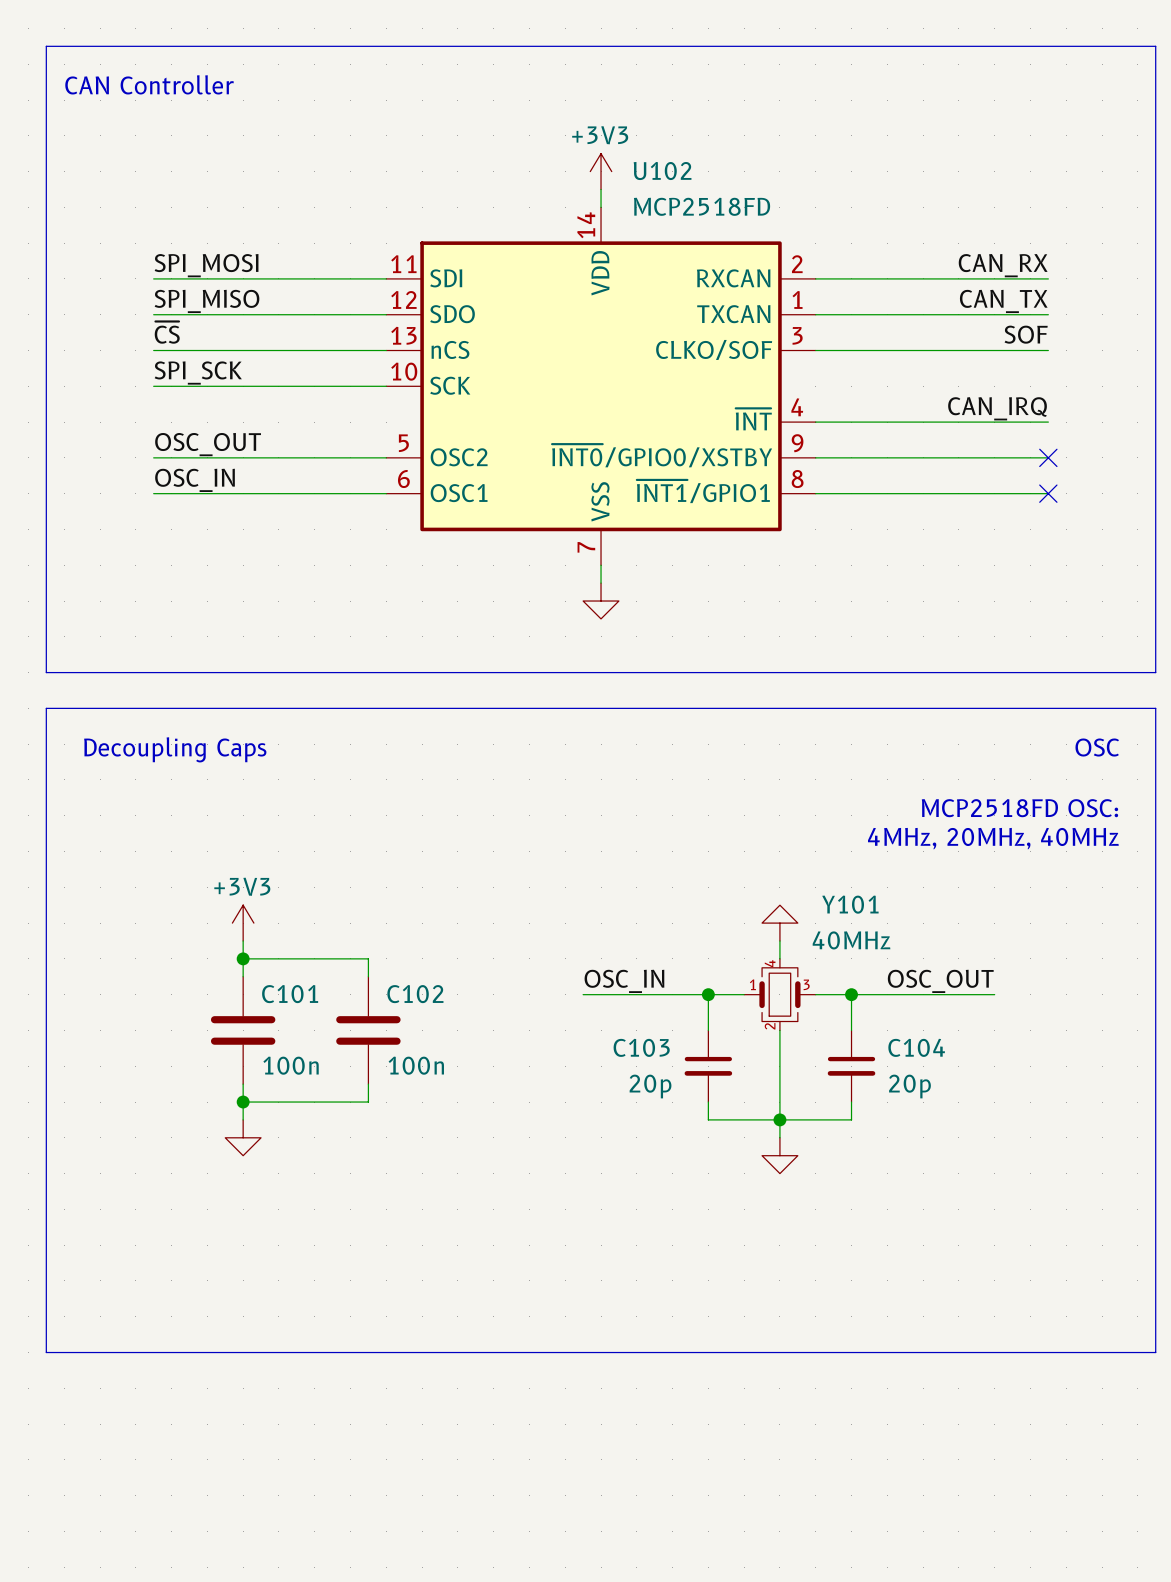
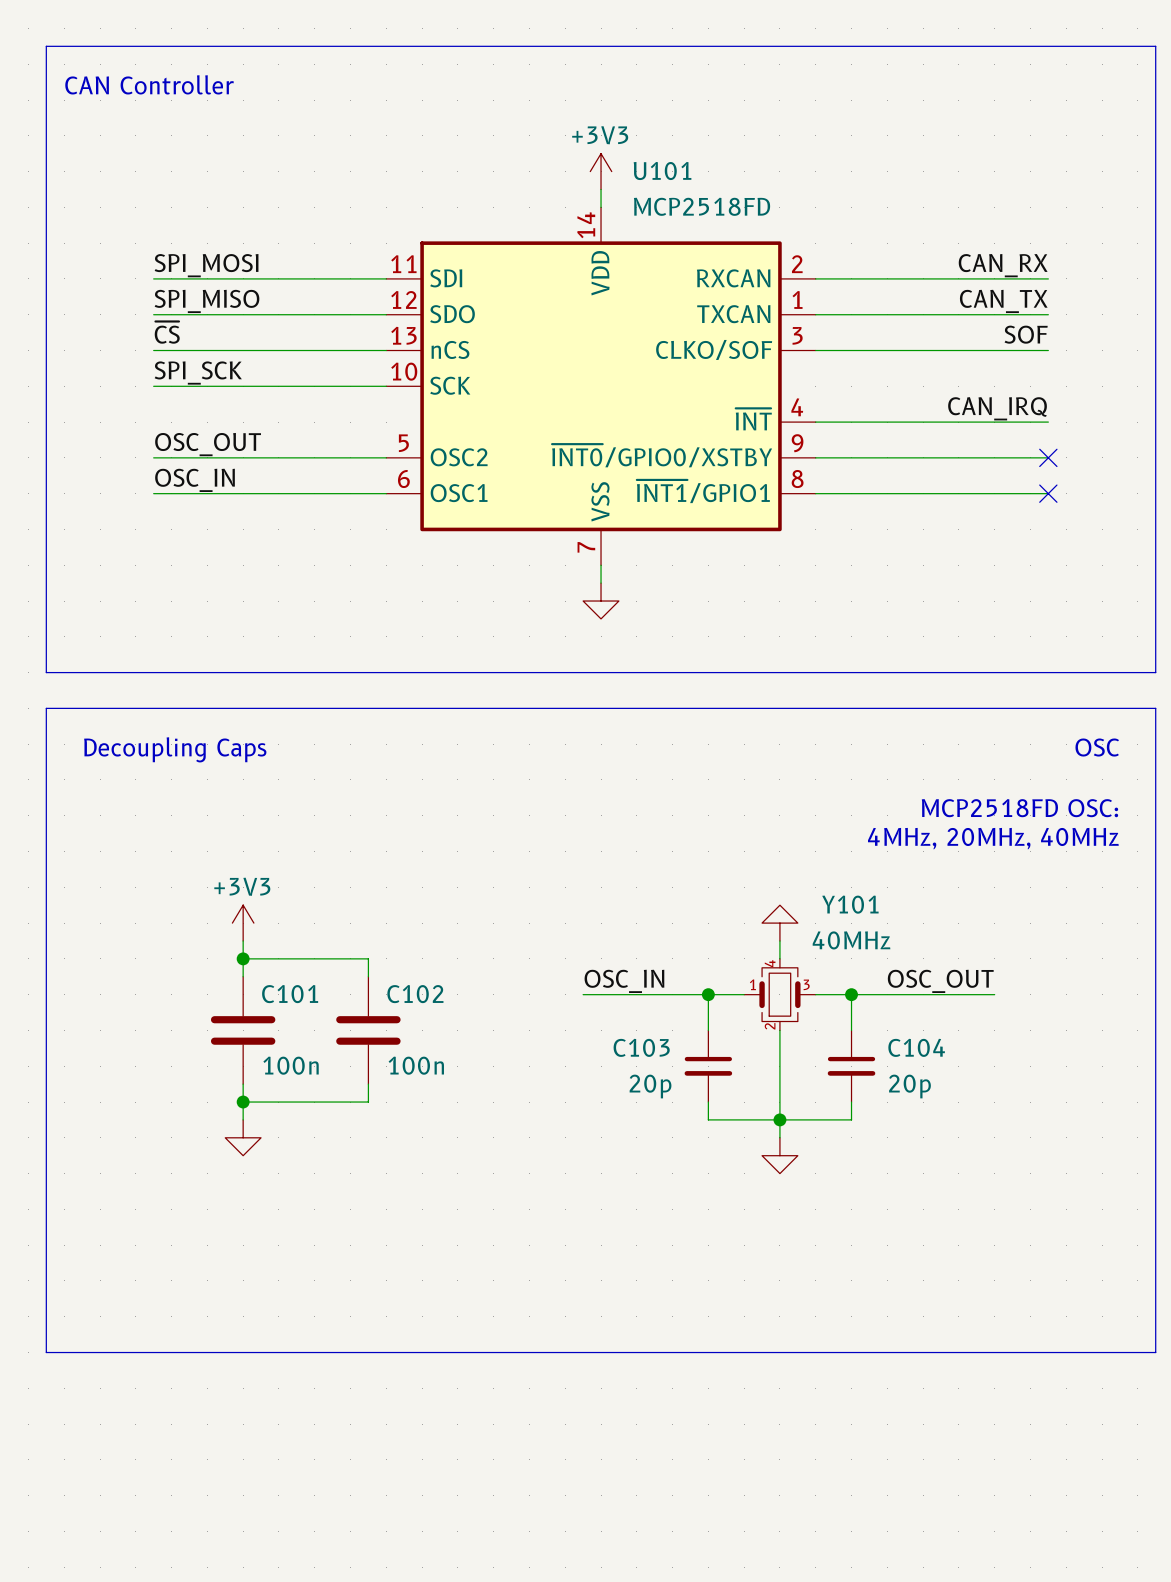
U102 name: U102 (662, 171) -> U101 (662, 171)

